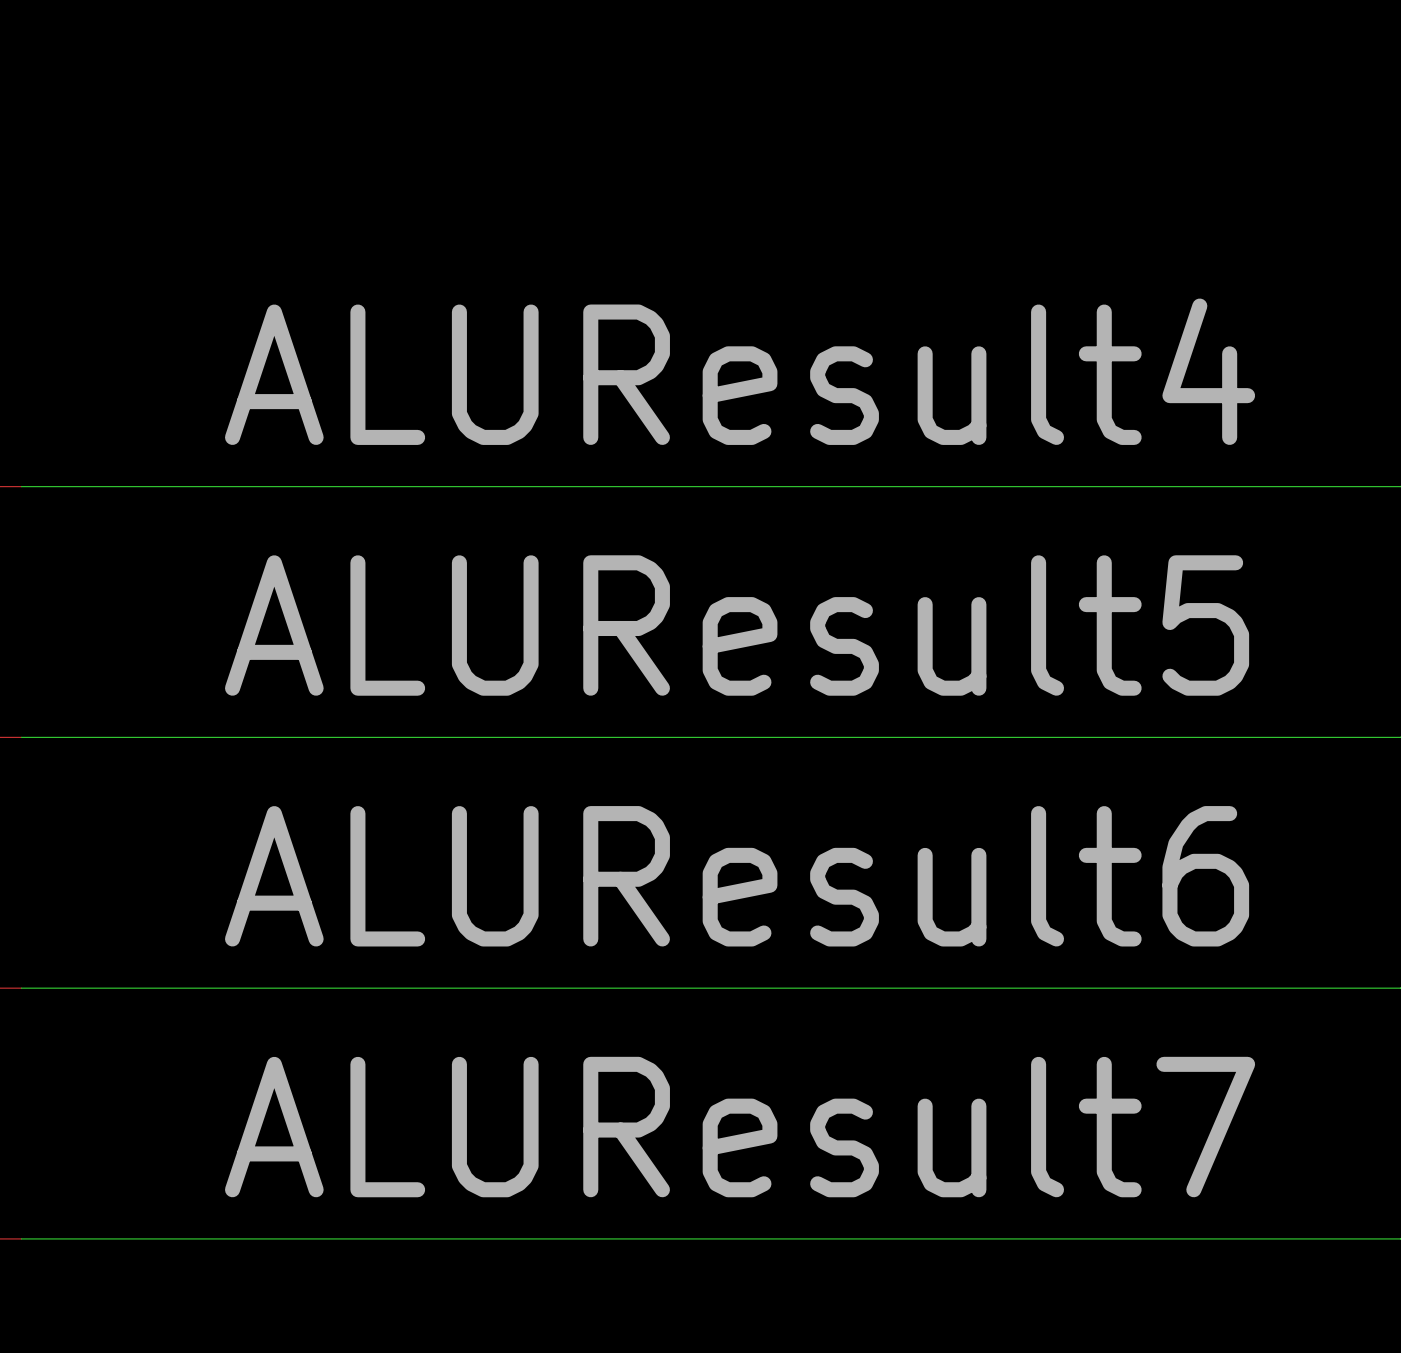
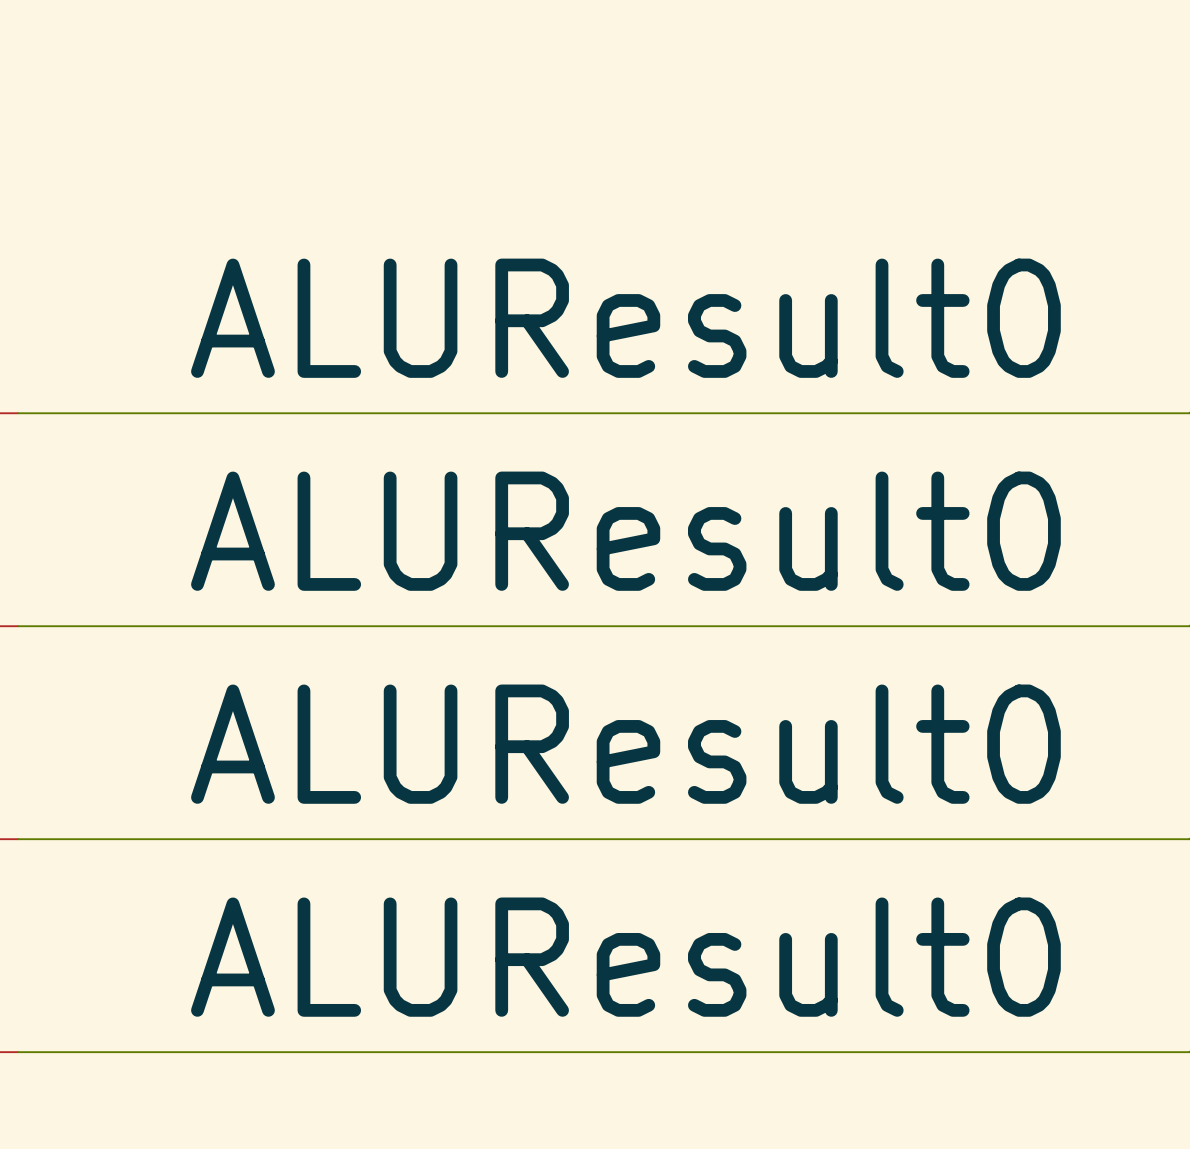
label: ALUResult4 (740, 371) -> ALUResult0 (625, 318)
label: ALUResult5 (737, 625) -> ALUResult0 (625, 531)
label: ALUResult6 (737, 876) -> ALUResult0 (625, 744)
label: ALUResult7 (740, 1127) -> ALUResult0 (625, 957)

